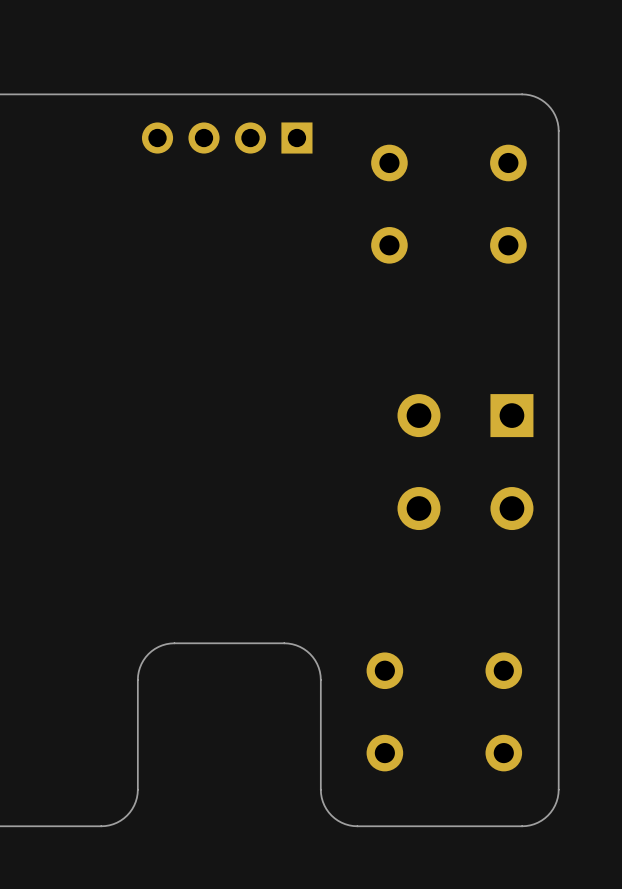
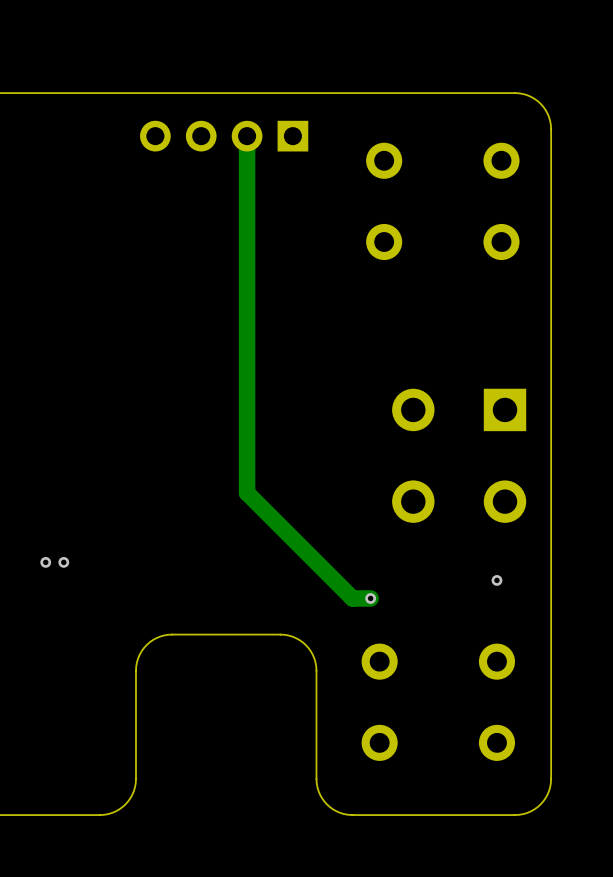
track: none -> (247, 136) (247, 492) (352, 598) (370, 598)
via: none -> (45, 562)
via: none -> (63, 562)
via: none -> (496, 580)
via: none -> (370, 598)

